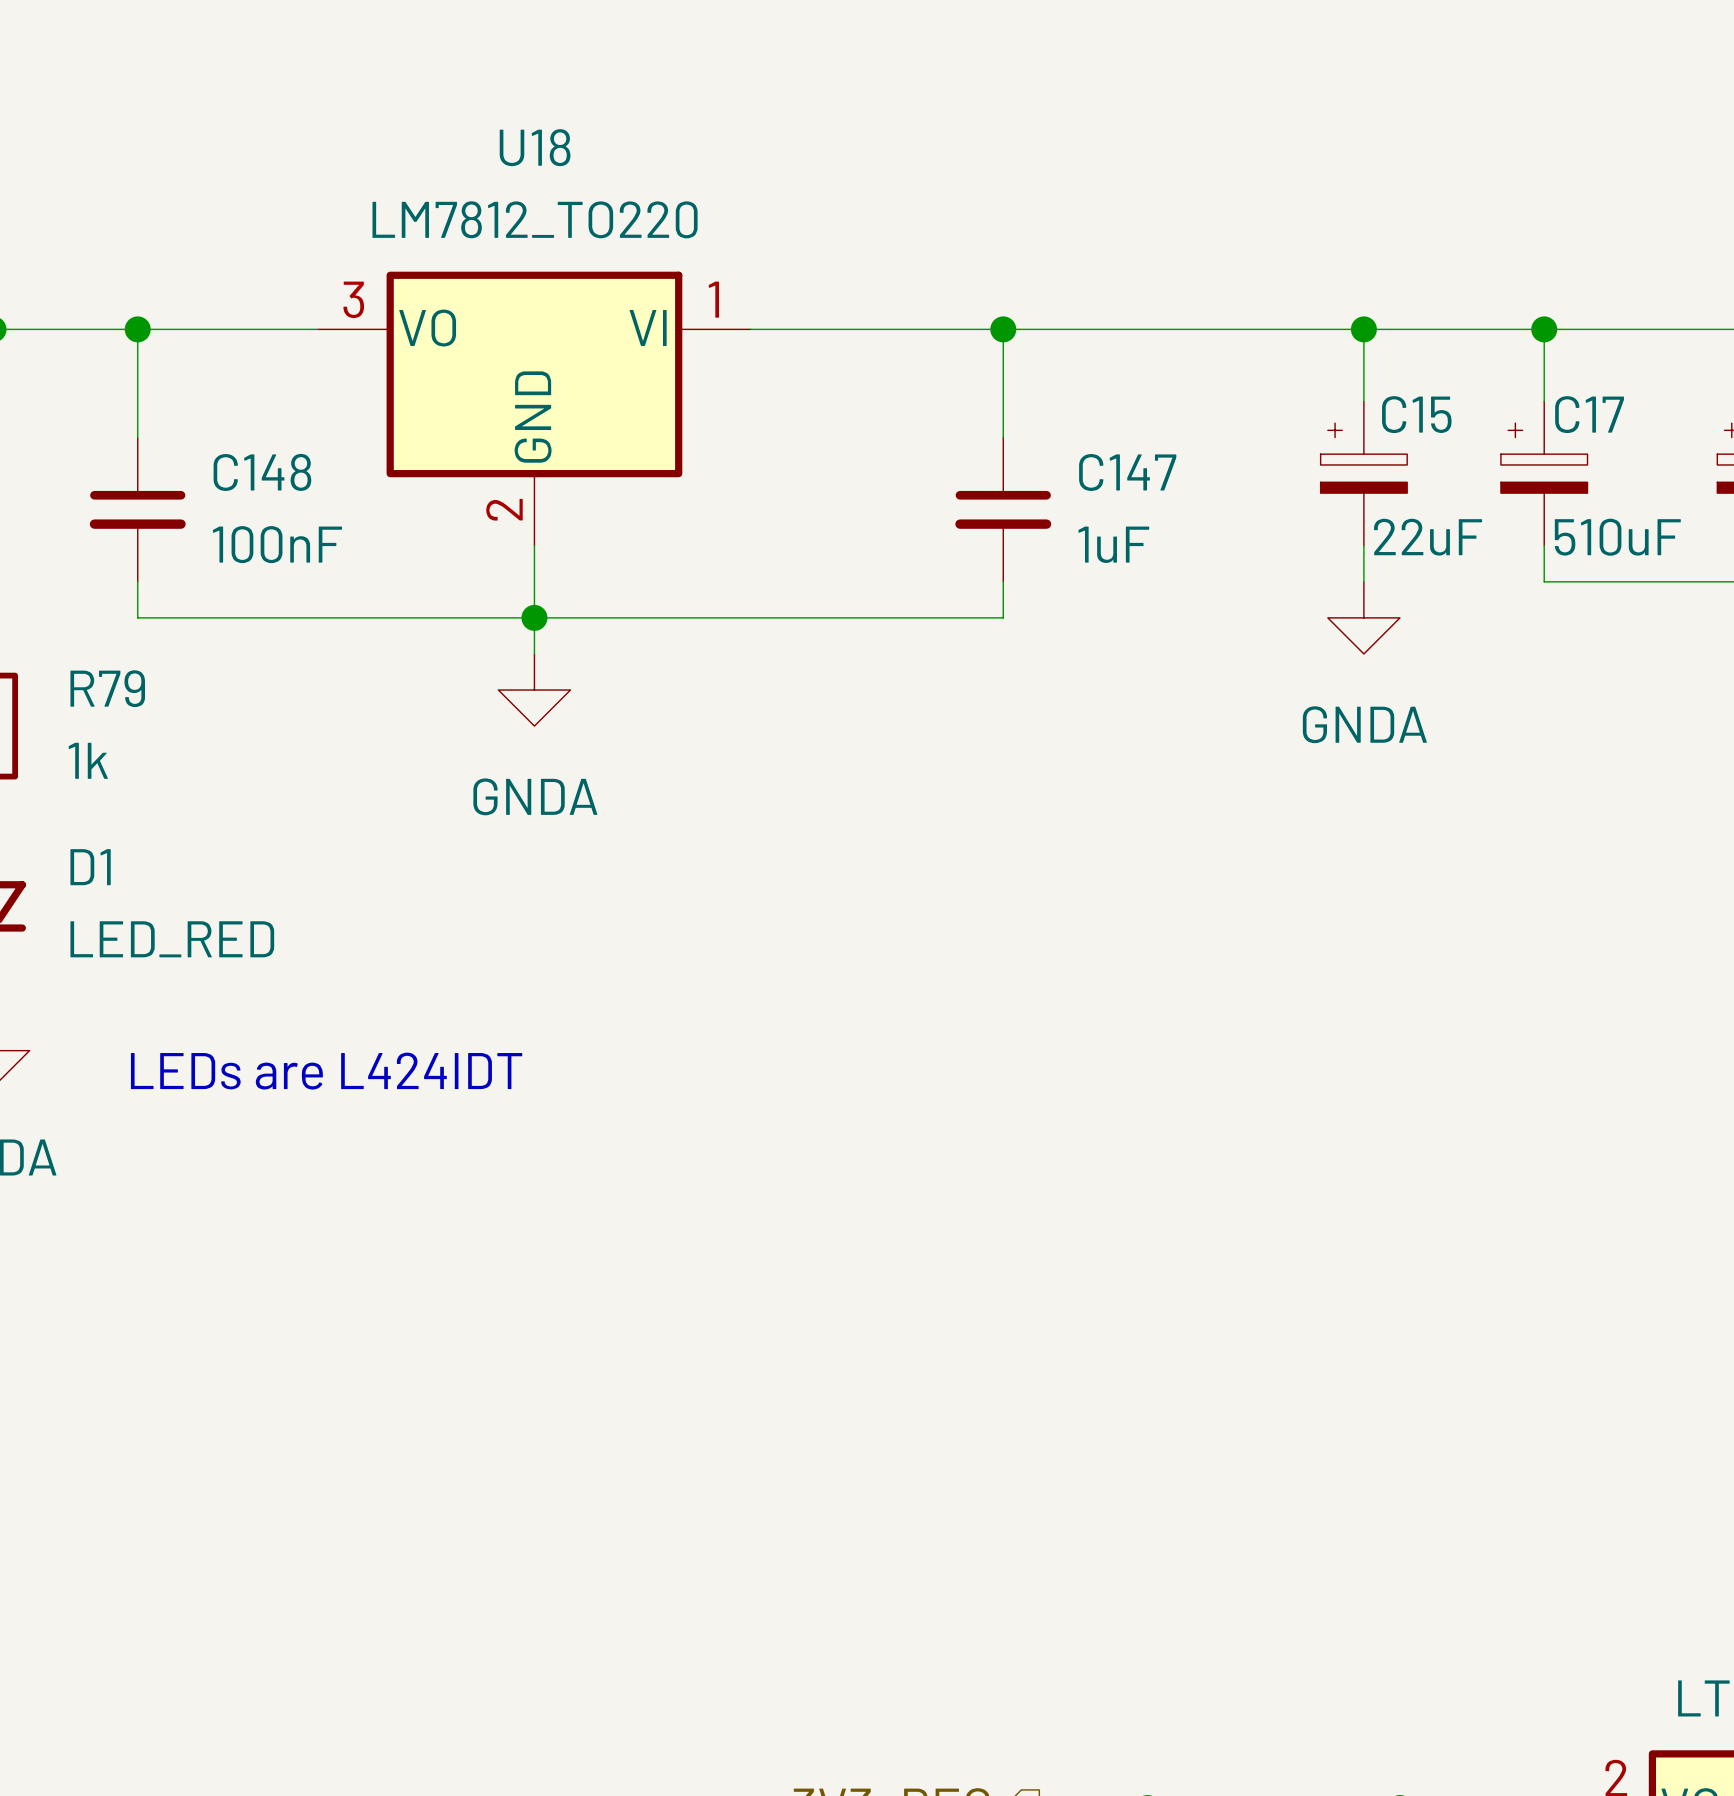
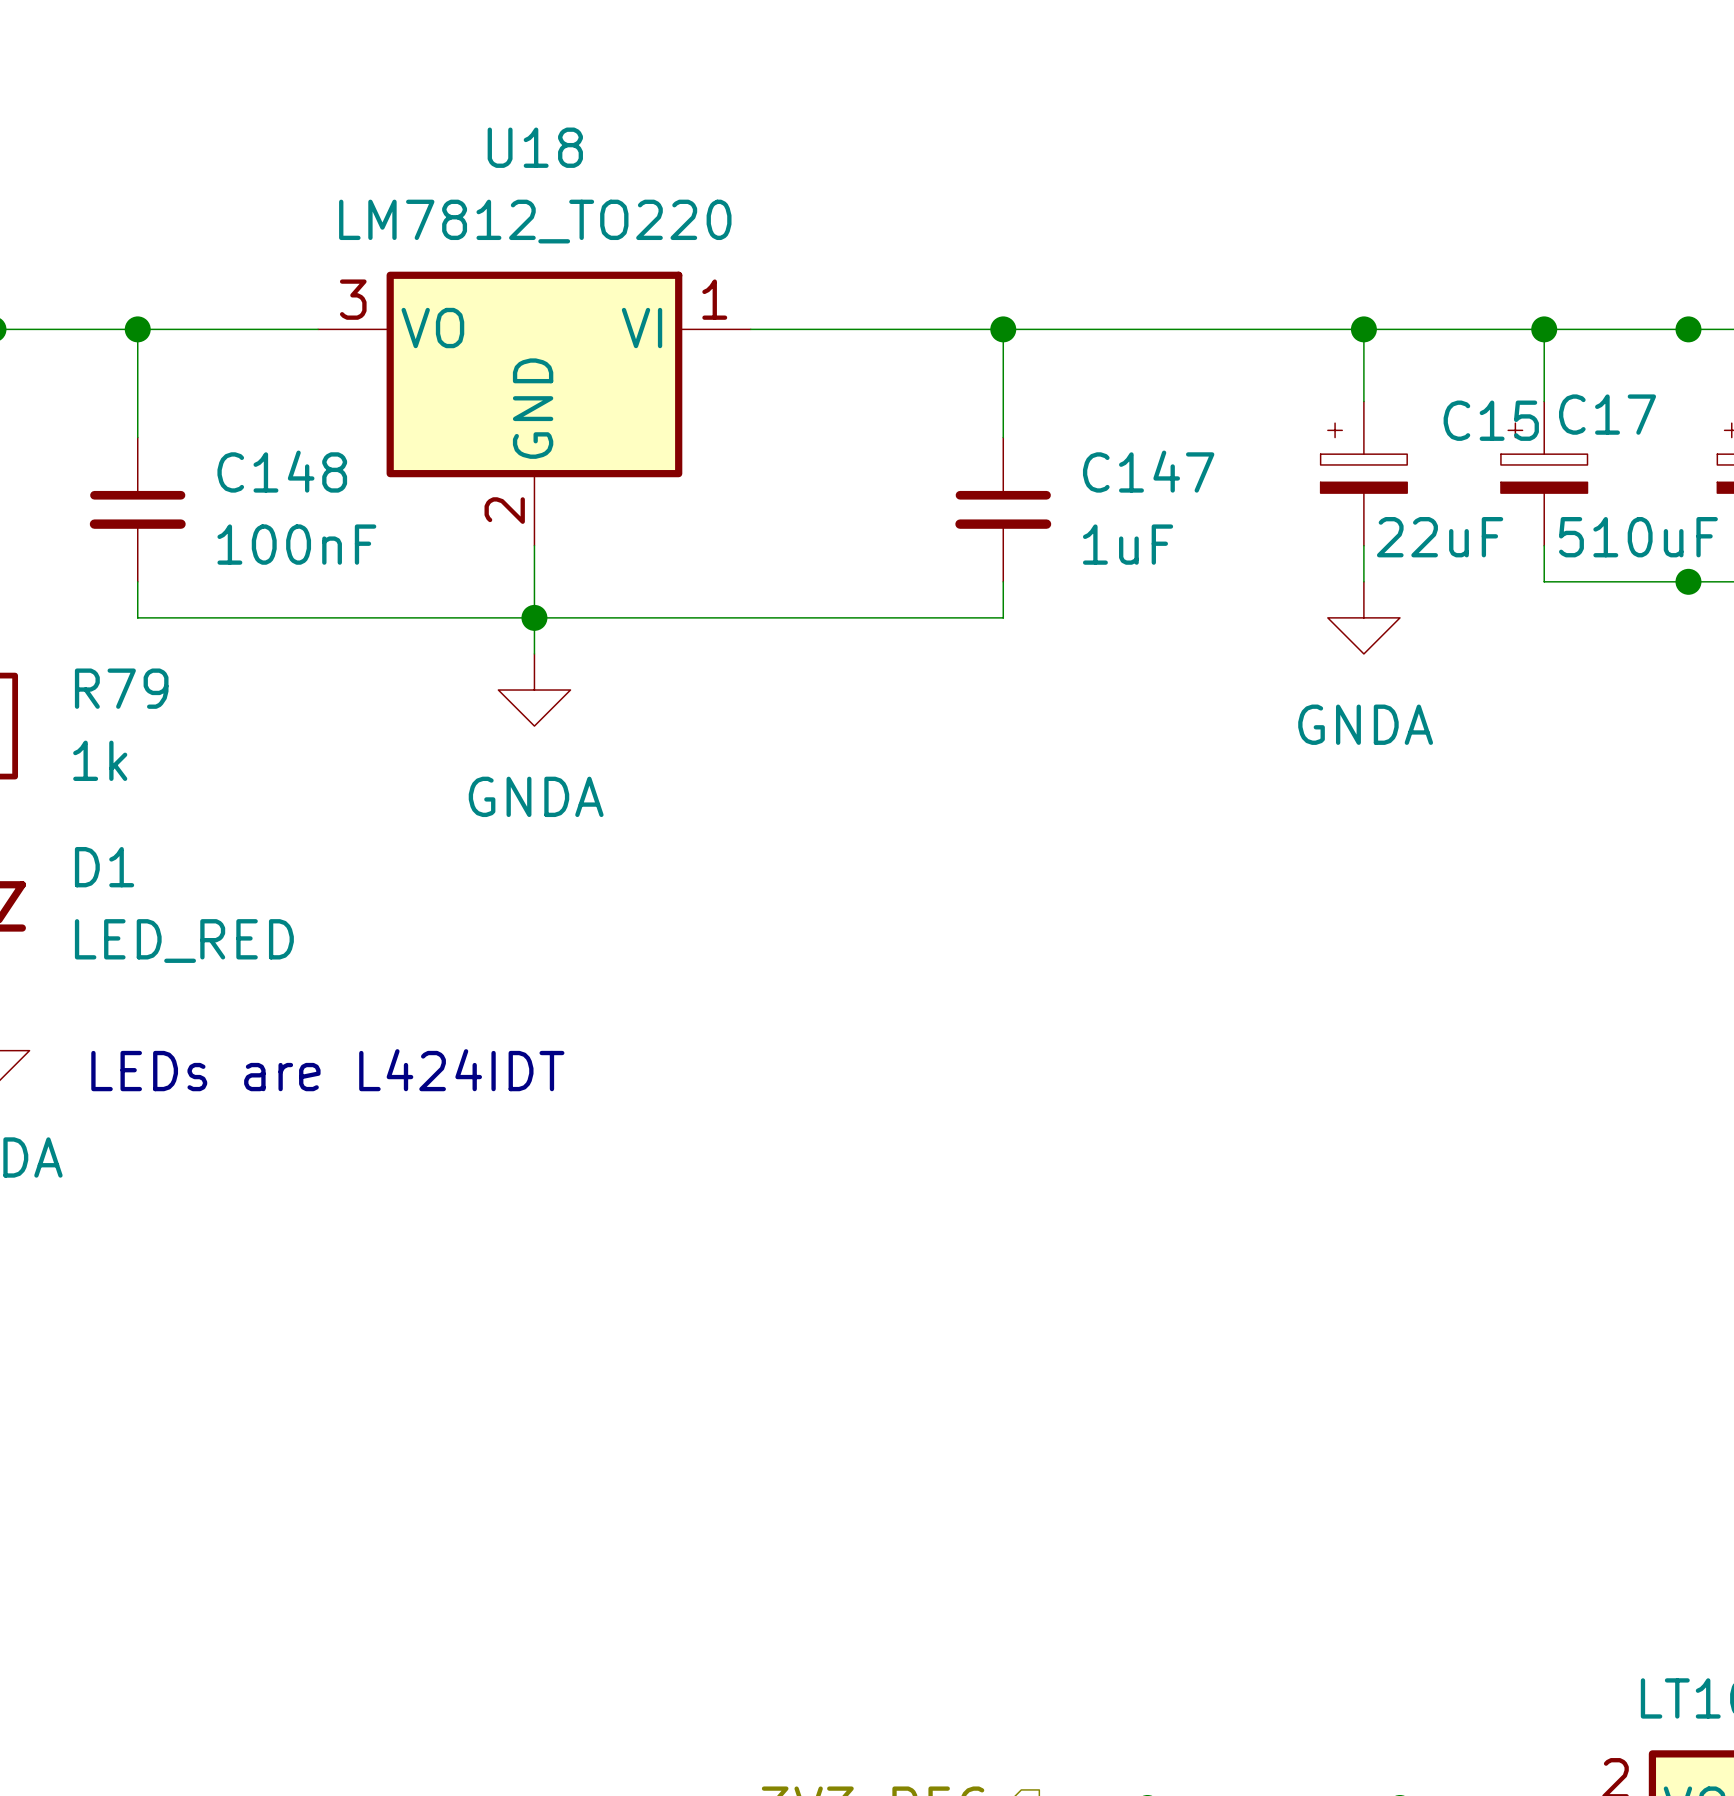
junction: none -> (1688, 329)
C15 name position: C15 (1416, 414) -> C15 (1491, 420)
junction: none -> (1688, 581)

